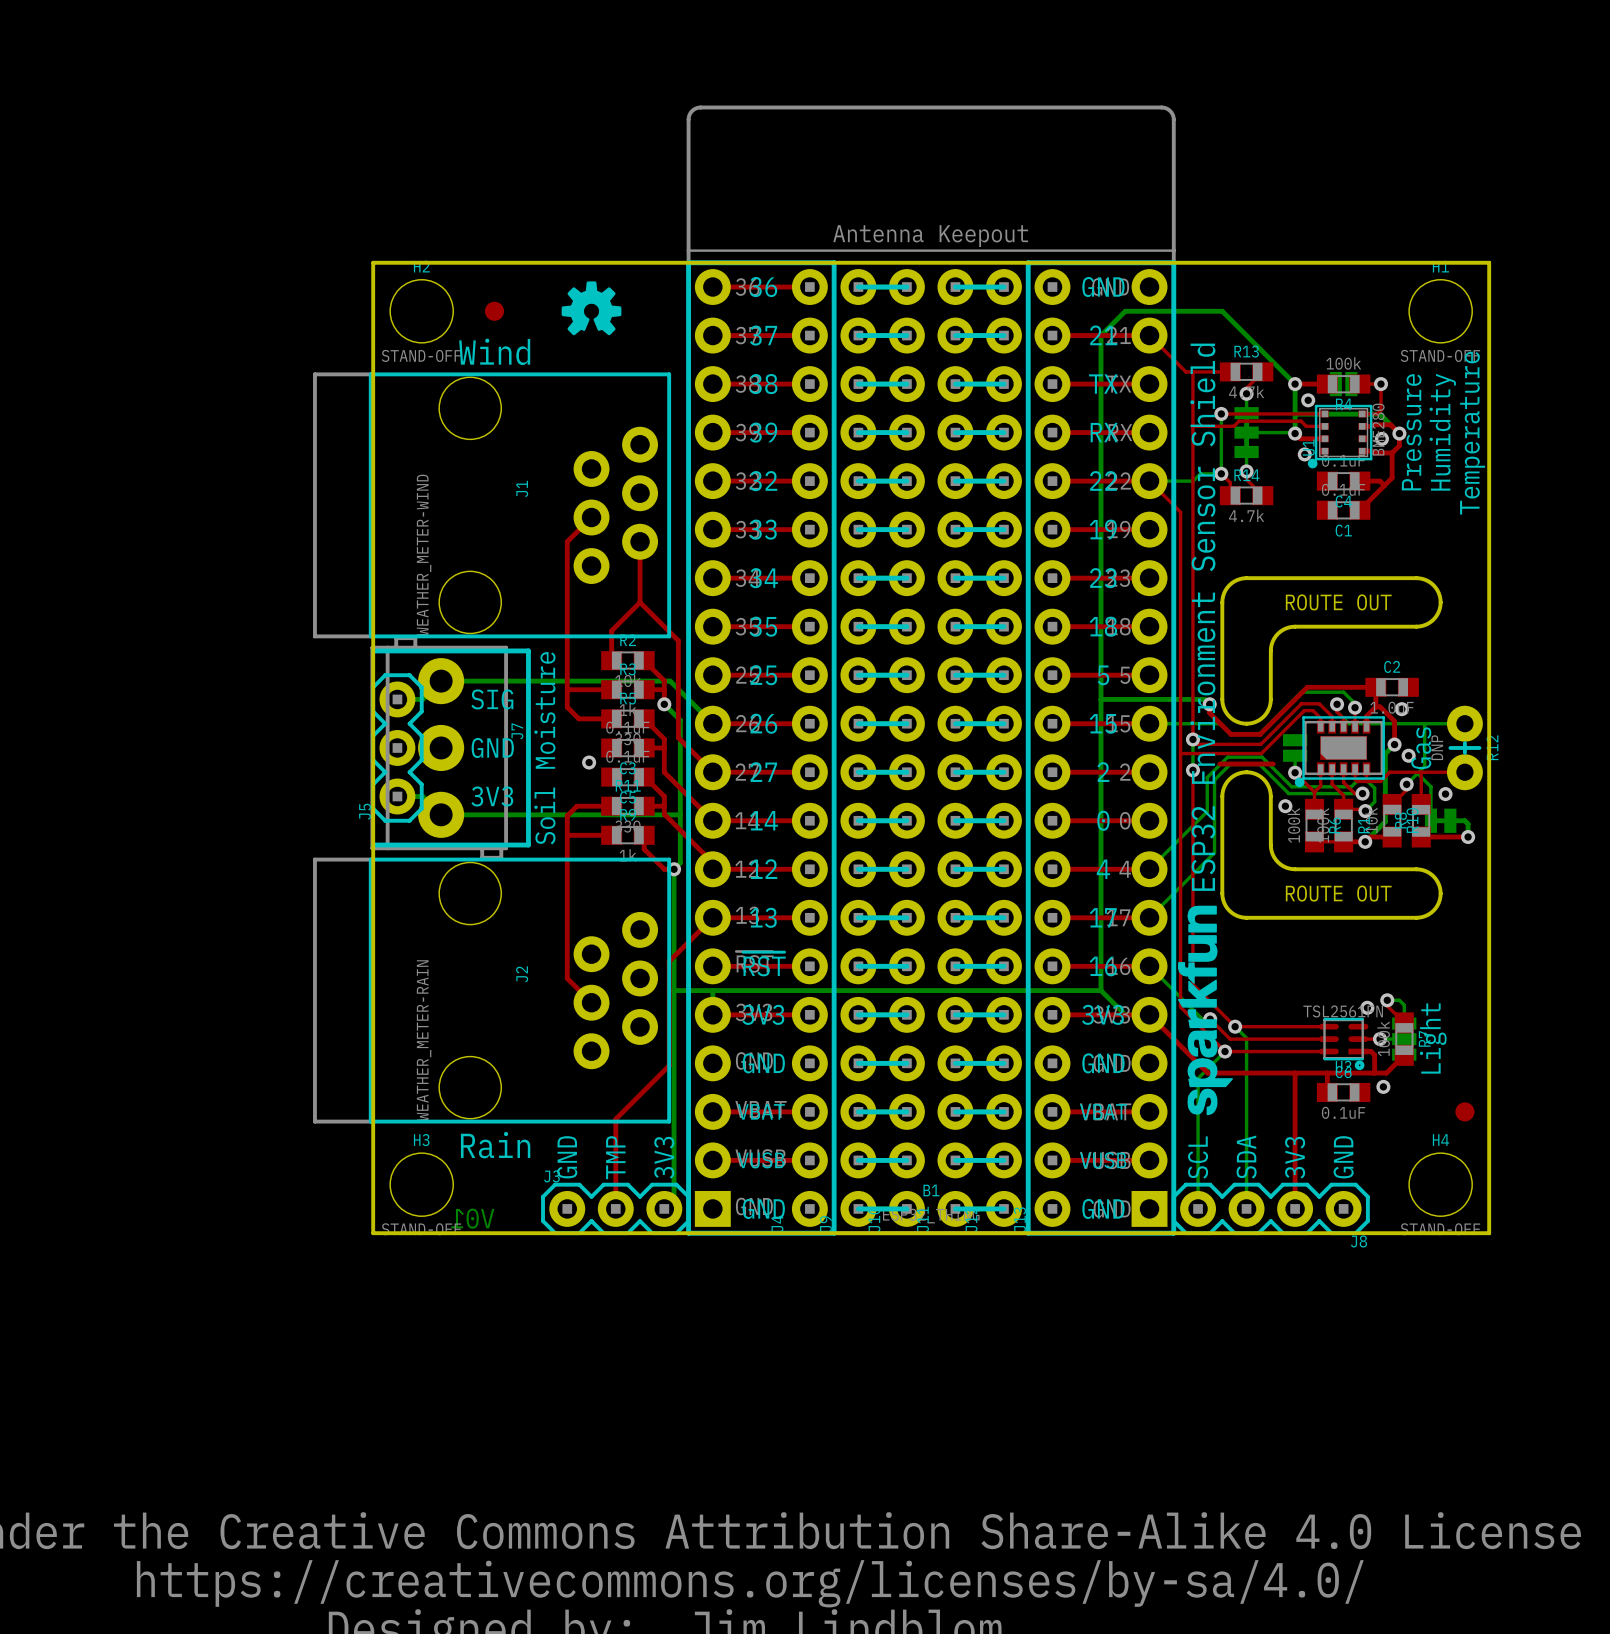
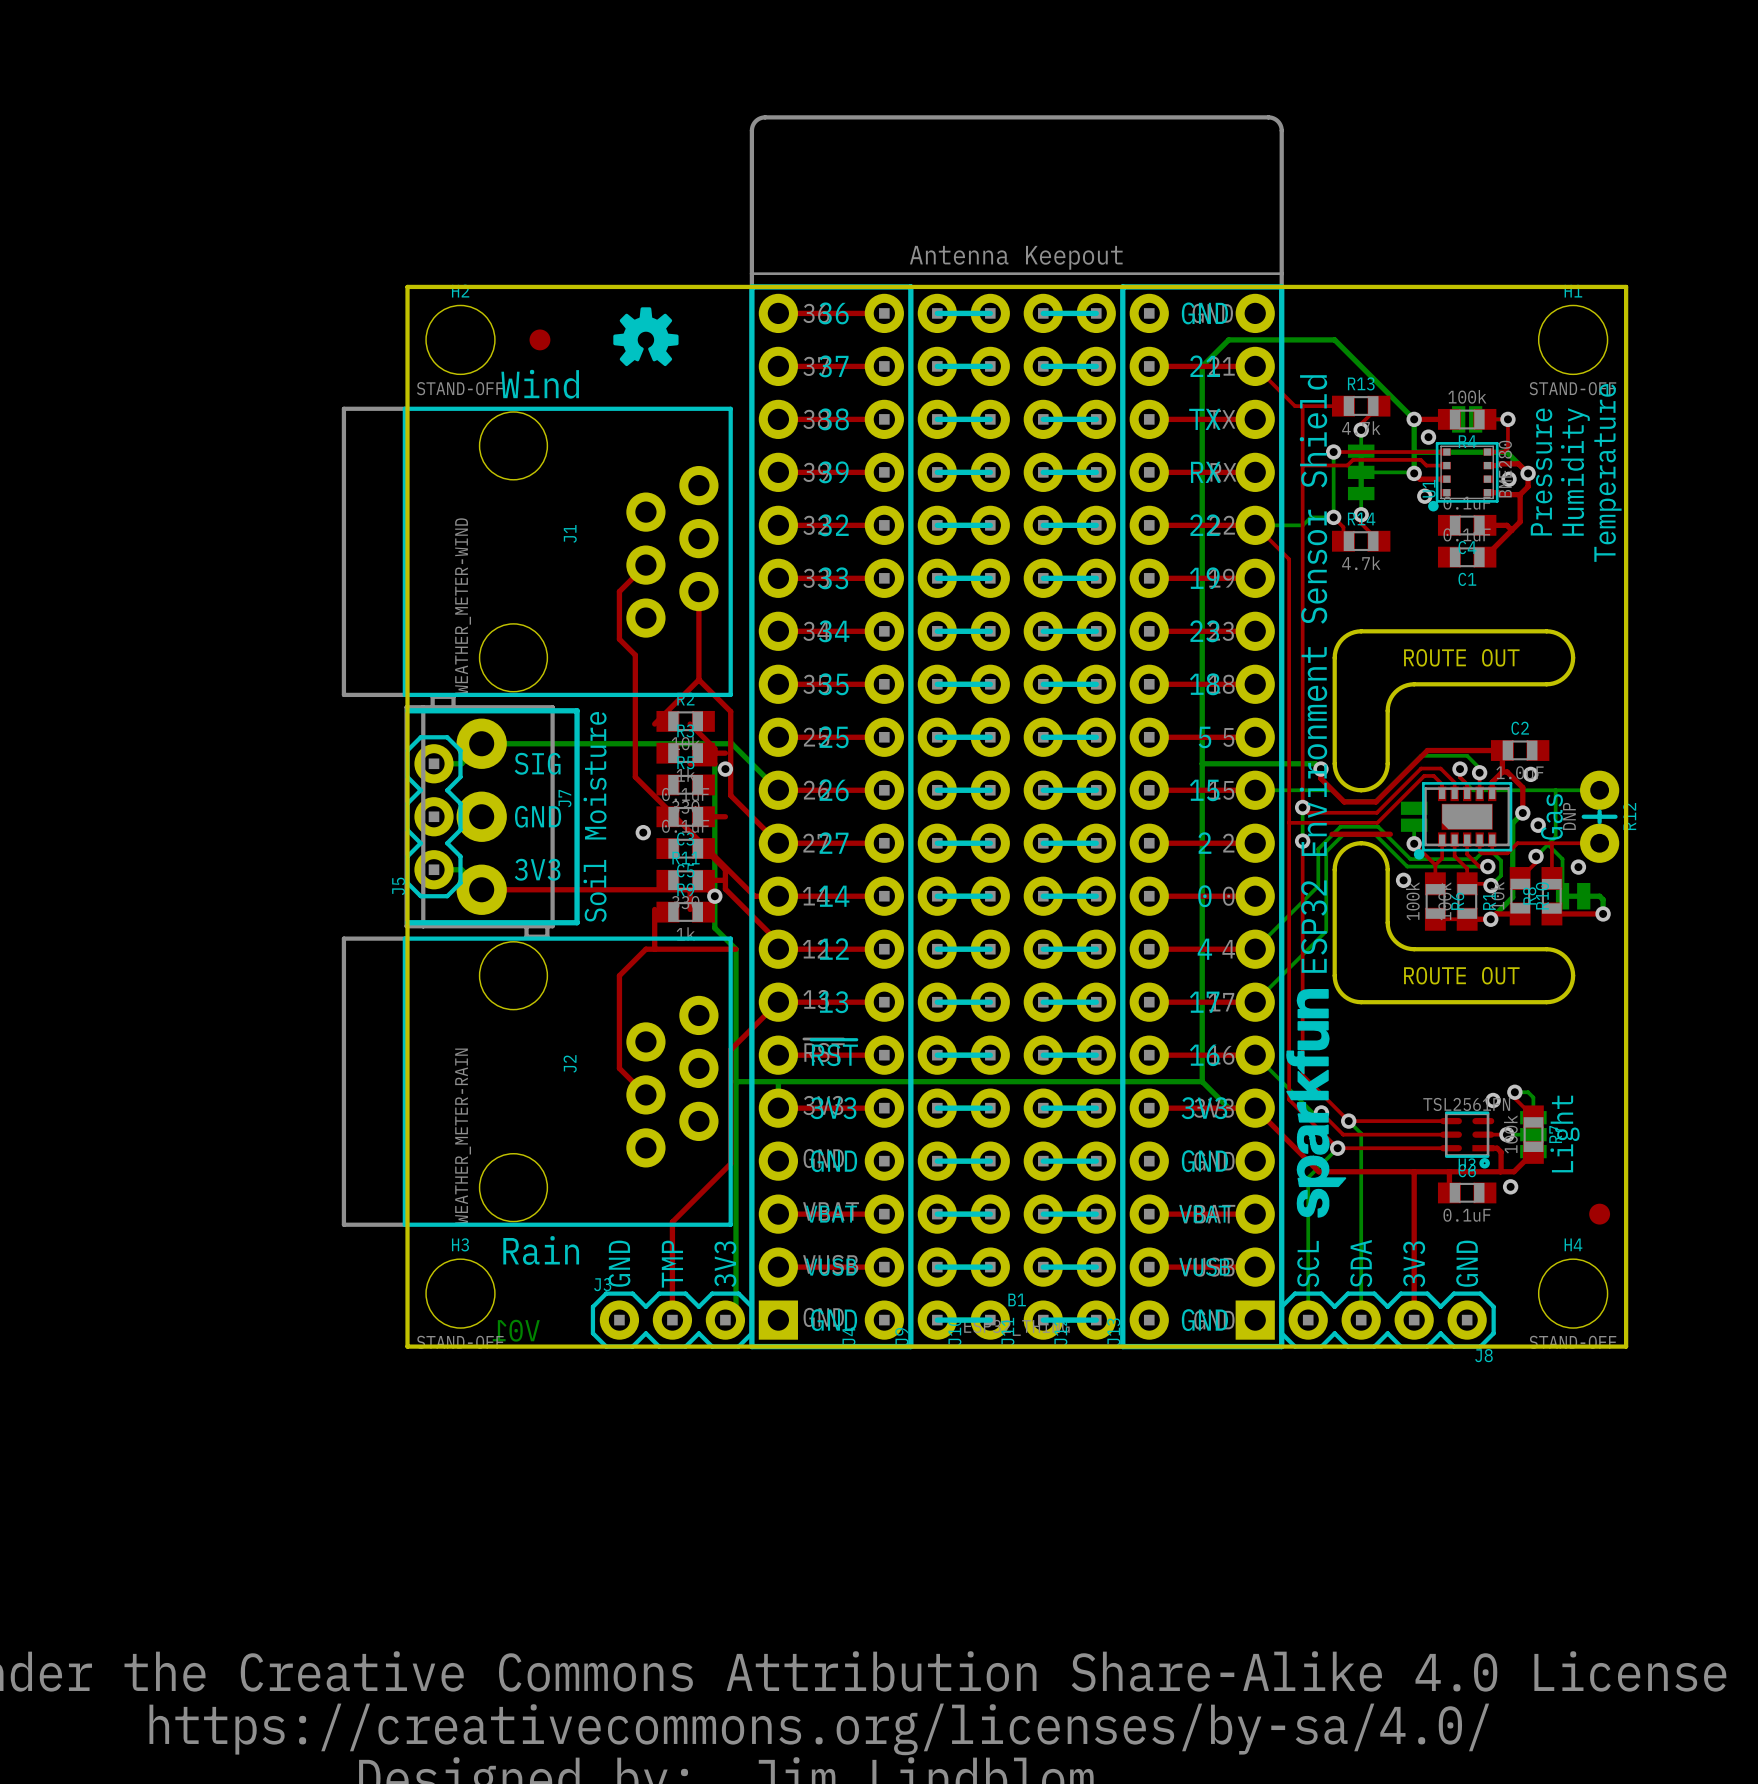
top track: (567, 585) (567, 707) (578, 718) (611, 718) -> (619, 639) (635, 655) (635, 777) (754, 896) (778, 896)
top track: none -> (698, 657) (698, 679)
top track: none -> (698, 679) (654, 724)
top track: (611, 660) (611, 630) (640, 602) (678, 640) (678, 737) -> (698, 679) (730, 711) (730, 795) (740, 805)
top track: (644, 660) (664, 680) (664, 704) -> none
top track: none -> (690, 724) (714, 748) (714, 763) (690, 763)
top track: (567, 689) (611, 689) -> none
bottom track: (664, 704) (680, 720) (680, 862) (674, 869) -> (714, 763) (714, 928) (736, 949)
top track: (644, 718) (664, 739) (664, 772) (712, 820) -> none
top track: (611, 806) (576, 806) (567, 815) (567, 893) -> (725, 949) (645, 949) (619, 975)
top track: none -> (481, 889) (708, 889) (714, 896)
bottom track: (441, 814) (680, 814) -> none
top track: none -> (690, 889) (690, 909)
top track: none -> (654, 909) (654, 949)
top track: (567, 835) (611, 835) -> none
top track: (644, 835) (644, 849) (664, 869) -> none
via position: (674, 869) -> (714, 896)

